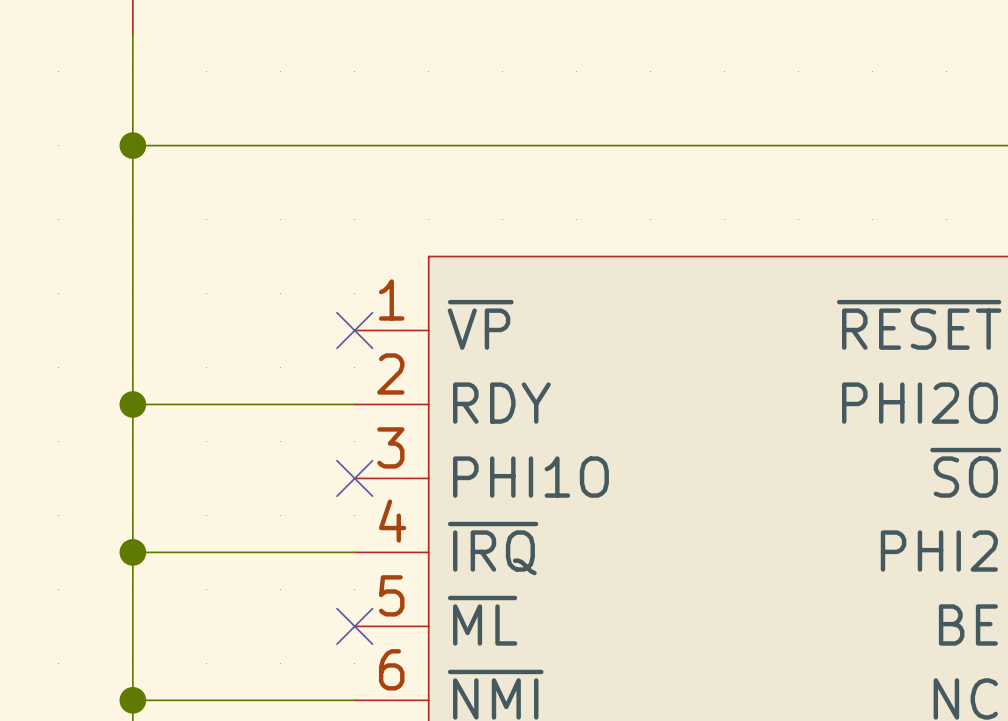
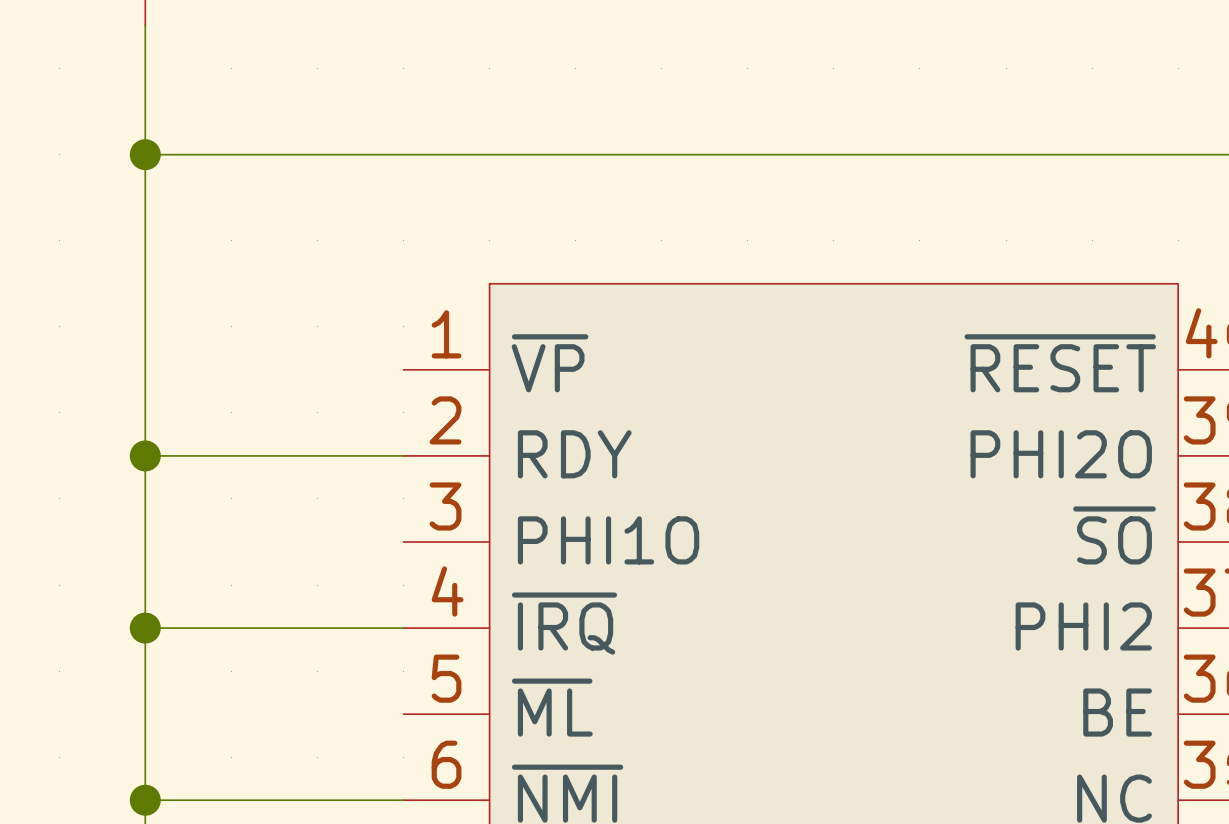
no-connect mark: (354, 330) -> none
no-connect mark: (354, 478) -> none
no-connect mark: (354, 626) -> none

